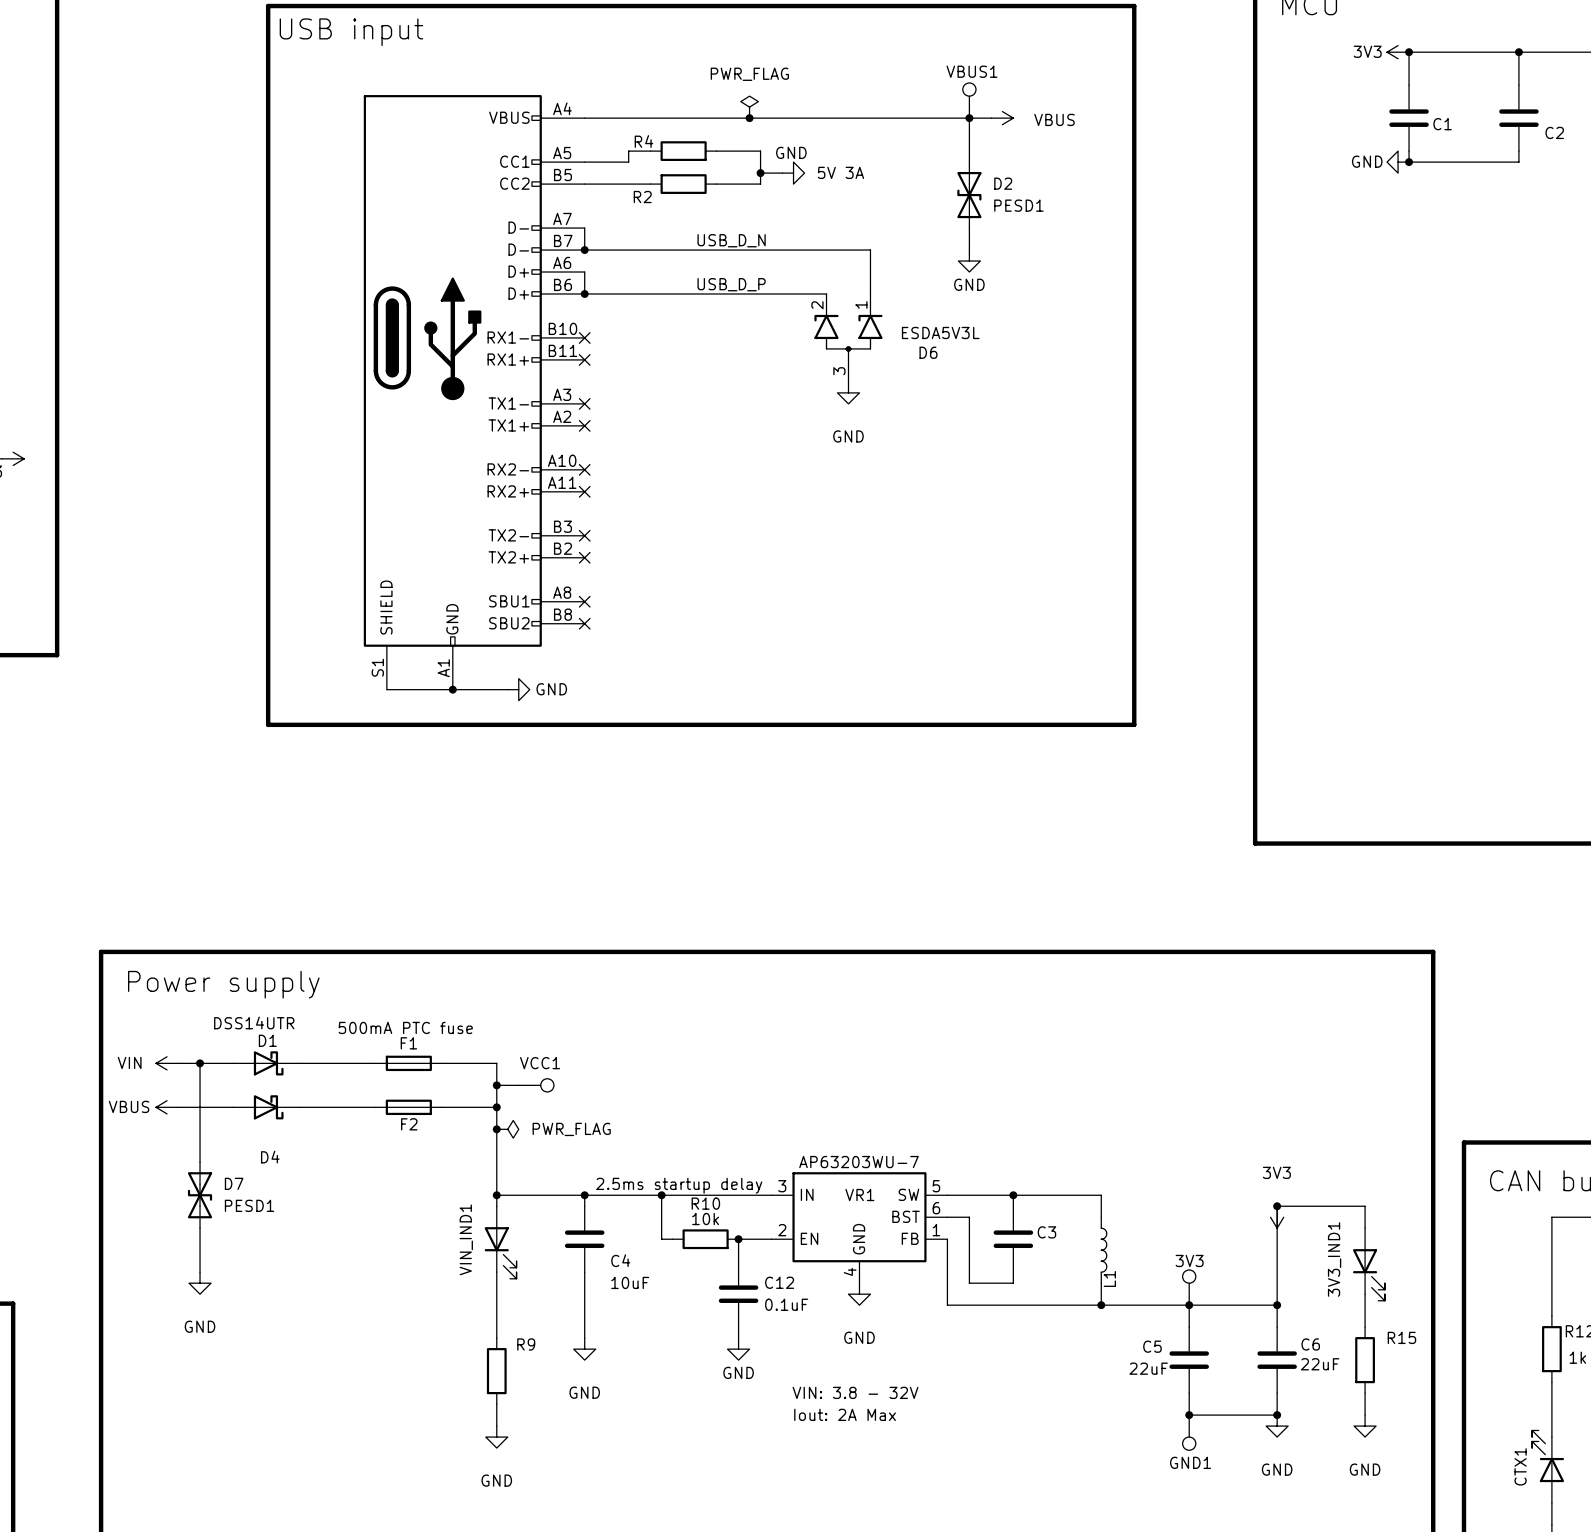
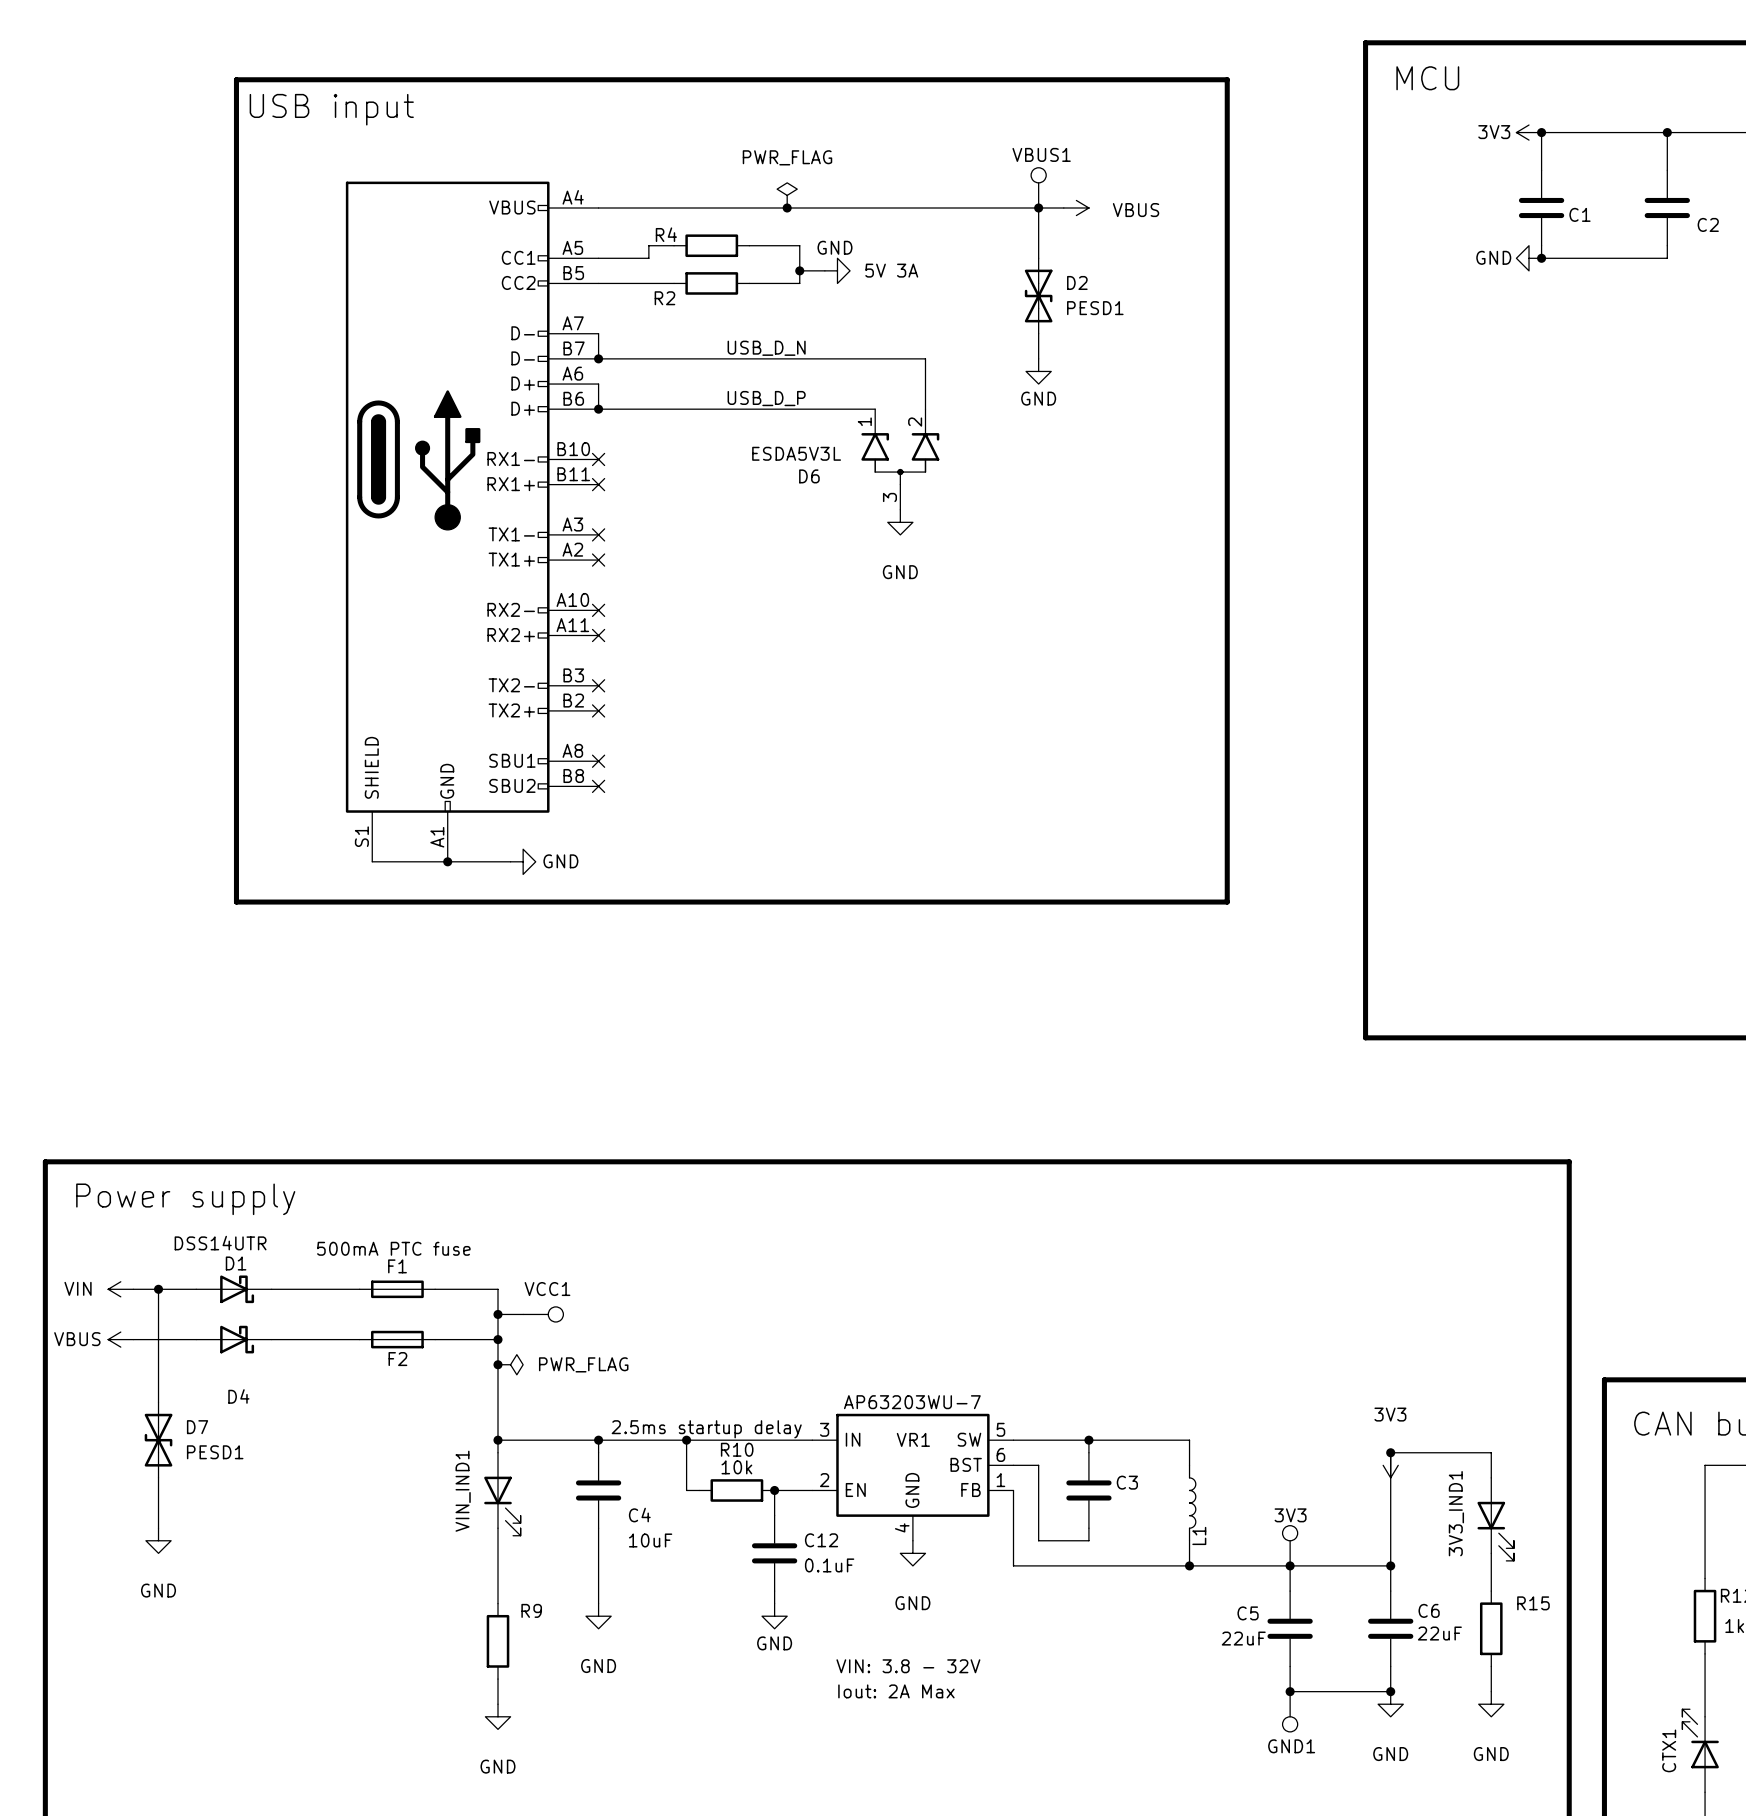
D6 flip: as is (848, 337) -> left-right (900, 458)

